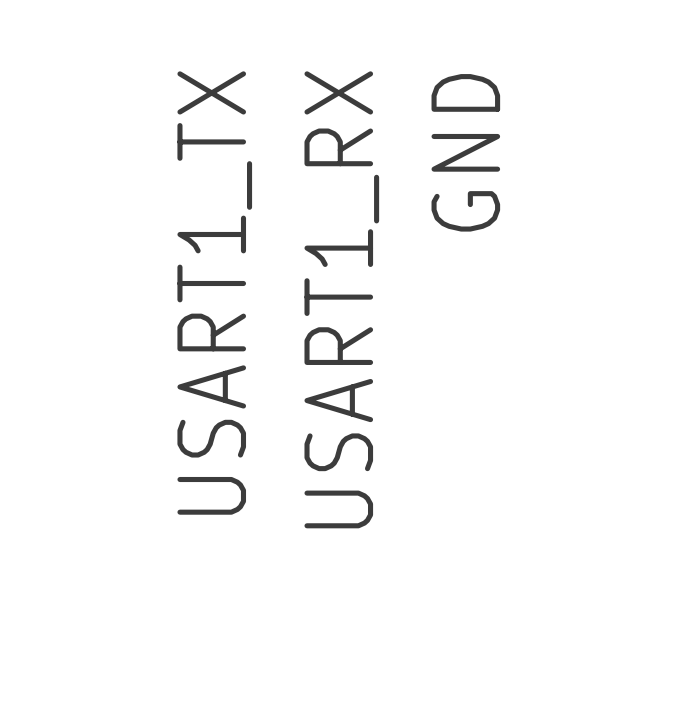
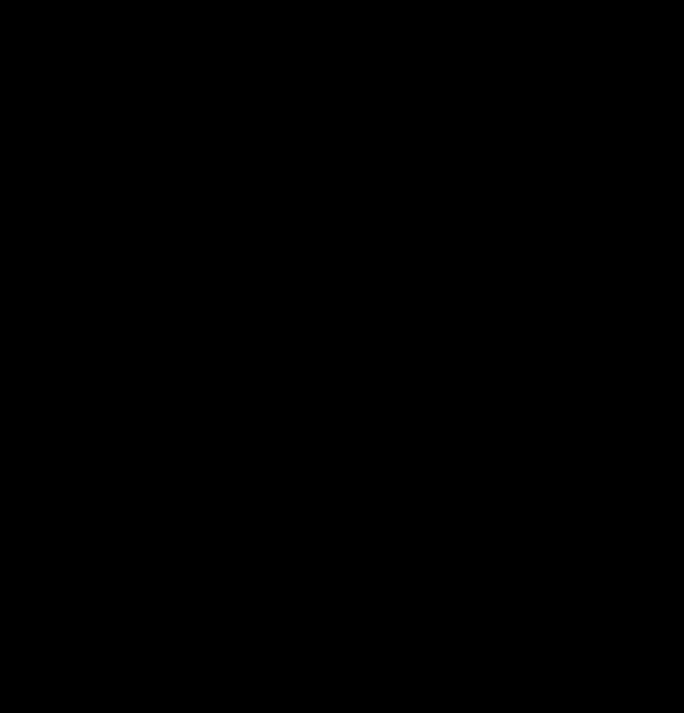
text: GND (465, 152) -> none
text: USART1_TX (214, 293) -> none
text: USART1_RX (341, 299) -> none

